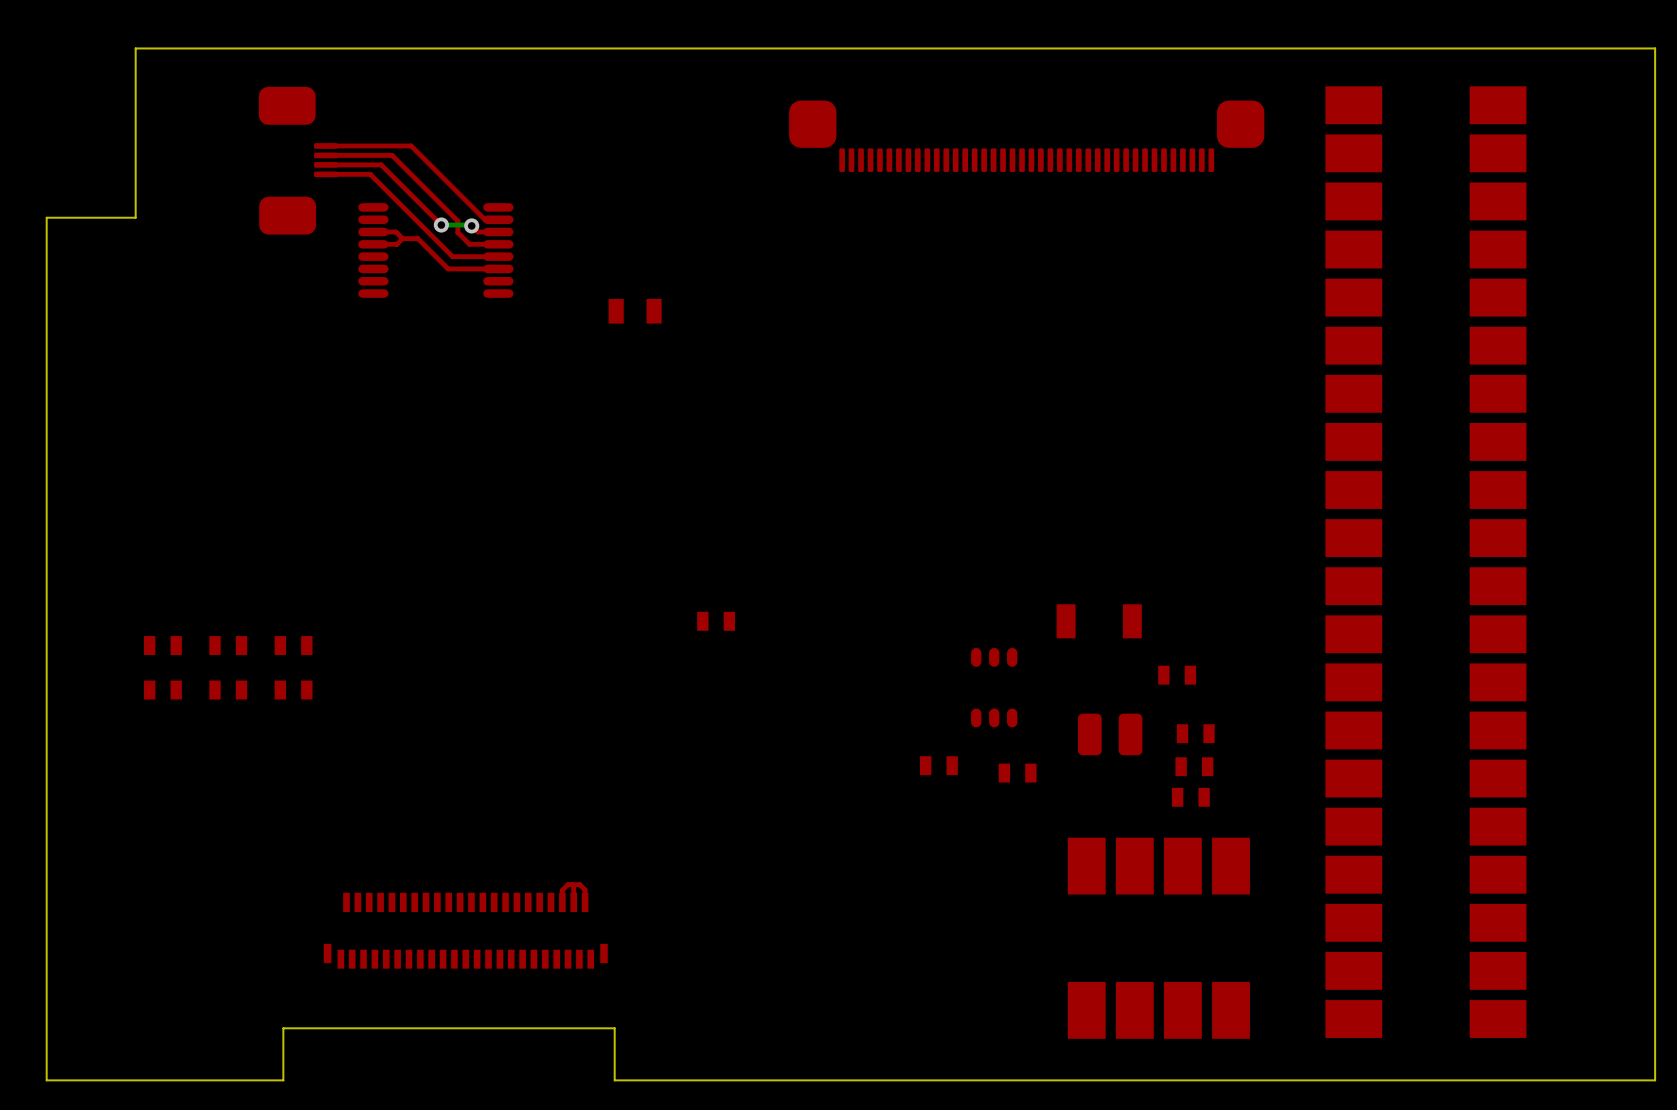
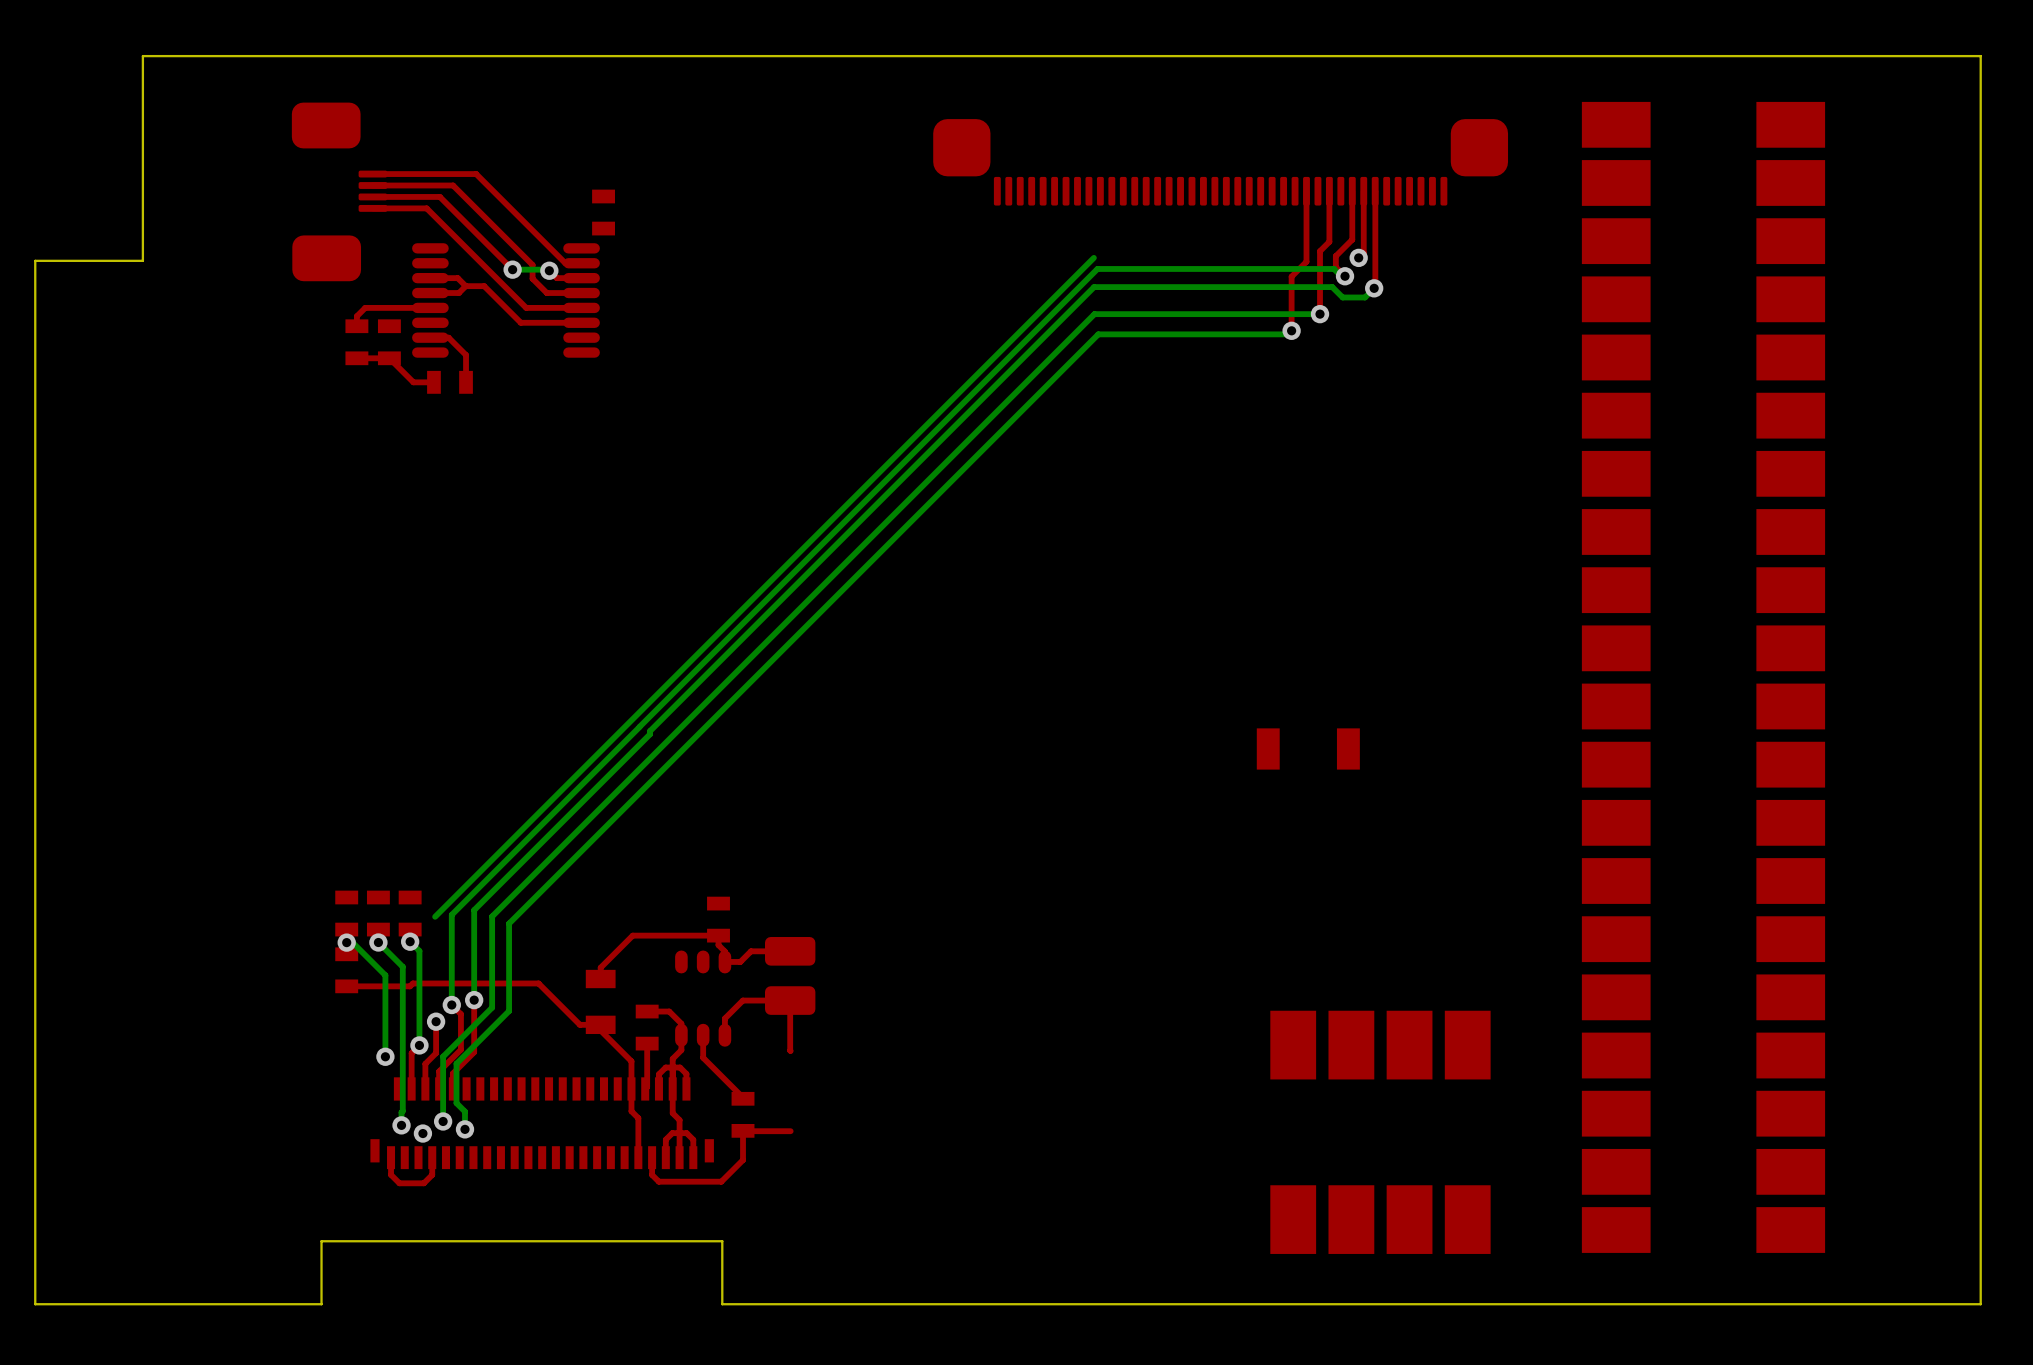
top track: none -> (1306, 191) (1306, 261) (1291, 276) (1291, 330)
top track: none -> (1329, 191) (1329, 241) (1320, 251) (1320, 314)
top track: none -> (1352, 191) (1352, 239) (1335, 256) (1335, 267) (1345, 276)
top track: none -> (1363, 191) (1363, 252) (1358, 257)
top track: none -> (1375, 191) (1374, 288)
part: none -> (603, 212)
bottom track: none -> (1093, 257) (435, 916)
via: none -> (1358, 257)
bottom track: none -> (1345, 276) (1343, 278) (1333, 268) (1097, 268) (451, 914) (451, 1005)
via: none -> (1345, 276)
bottom track: none -> (1374, 288) (1365, 297) (1342, 297) (1332, 287) (1094, 287) (650, 731) (650, 734) (474, 910) (474, 1000)
via: none -> (1374, 288)
top track: none -> (430, 307) (365, 307) (356, 316) (356, 326)
bottom track: none -> (1320, 314) (1094, 314) (492, 916) (492, 1007) (443, 1056) (443, 1121)
via: none -> (1320, 314)
bottom track: none -> (1291, 330) (1288, 334) (1098, 334) (509, 923) (509, 1011) (456, 1063) (456, 1103) (464, 1111) (464, 1129)
via: none -> (1291, 330)
top track: none -> (430, 337) (448, 337) (466, 355) (466, 382)
part: none -> (356, 342)
part: none -> (389, 342)
top track: none -> (356, 358) (389, 358) (413, 382) (433, 382)
part: (635, 311) -> none
part: none -> (449, 382)
part: (716, 621) -> none
part: (162, 645) -> none
part: (228, 645) -> none
part: (293, 645) -> none
part: (1177, 675) -> none
part position: (994, 687) -> (703, 998)
part: (162, 690) -> none
part: (228, 690) -> none
part: (293, 690) -> none
part: (1195, 733) -> none
part rotation: 0° (1110, 734) -> 90° clockwise (790, 975)
part position: (1110, 734) -> (790, 975)
part: none -> (346, 913)
part: none -> (378, 913)
part: none -> (410, 913)
part: none -> (718, 919)
part: (938, 765) -> none
part: (1194, 766) -> none
part: (1017, 773) -> none
bottom track: none -> (410, 941) (419, 951) (419, 1045)
via: none -> (410, 941)
bottom track: none -> (346, 942) (352, 942) (385, 975) (385, 1056)
via: none -> (346, 942)
bottom track: none -> (378, 942) (402, 966) (401, 1125)
via: none -> (378, 942)
top track: none -> (790, 951) (751, 951) (740, 961) (724, 961) (724, 951) (718, 945) (718, 935) (632, 935) (600, 967) (600, 979)
part: (1190, 797) -> none
part: none -> (346, 970)
top track: none -> (346, 986) (410, 986) (412, 983) (538, 983) (579, 1024) (600, 1024) (600, 1030) (631, 1061) (631, 1111) (638, 1118) (638, 1157)
top track: none -> (474, 1000) (474, 1052) (452, 1073) (452, 1088)
via: none -> (474, 1000)
part: none -> (600, 1001)
top track: none -> (451, 1005) (460, 1014) (460, 1049) (439, 1071) (439, 1088)
via: none -> (451, 1005)
top track: none -> (647, 1011) (669, 1011) (681, 1023) (681, 1050) (672, 1058) (672, 1068)
top track: none -> (436, 1021) (436, 1053) (425, 1063) (425, 1088)
via: none -> (436, 1021)
part: none -> (647, 1027)
top track: none -> (703, 1035) (703, 1057) (743, 1098)
top track: none -> (724, 1035) (724, 1018) (742, 1000) (790, 1000) (790, 1051)
top track: none -> (647, 1043) (647, 1087) (645, 1088)
top track: none -> (419, 1045) (411, 1053) (411, 1088)
via: none -> (419, 1045)
via: none -> (385, 1056)
top track: none -> (672, 1088) (672, 1113) (679, 1120) (679, 1157)
part: none -> (743, 1114)
via: none -> (443, 1121)
via: none -> (401, 1125)
via: none -> (464, 1129)
top track: none -> (790, 1131) (743, 1130) (743, 1160) (721, 1181) (658, 1181) (652, 1174) (652, 1157)
via: none -> (422, 1133)
top track: none -> (432, 1157) (432, 1174) (423, 1183) (399, 1183) (391, 1174) (391, 1157)
top track: none -> (693, 1157) (693, 1139) (686, 1133) (672, 1133) (665, 1139) (665, 1157)

